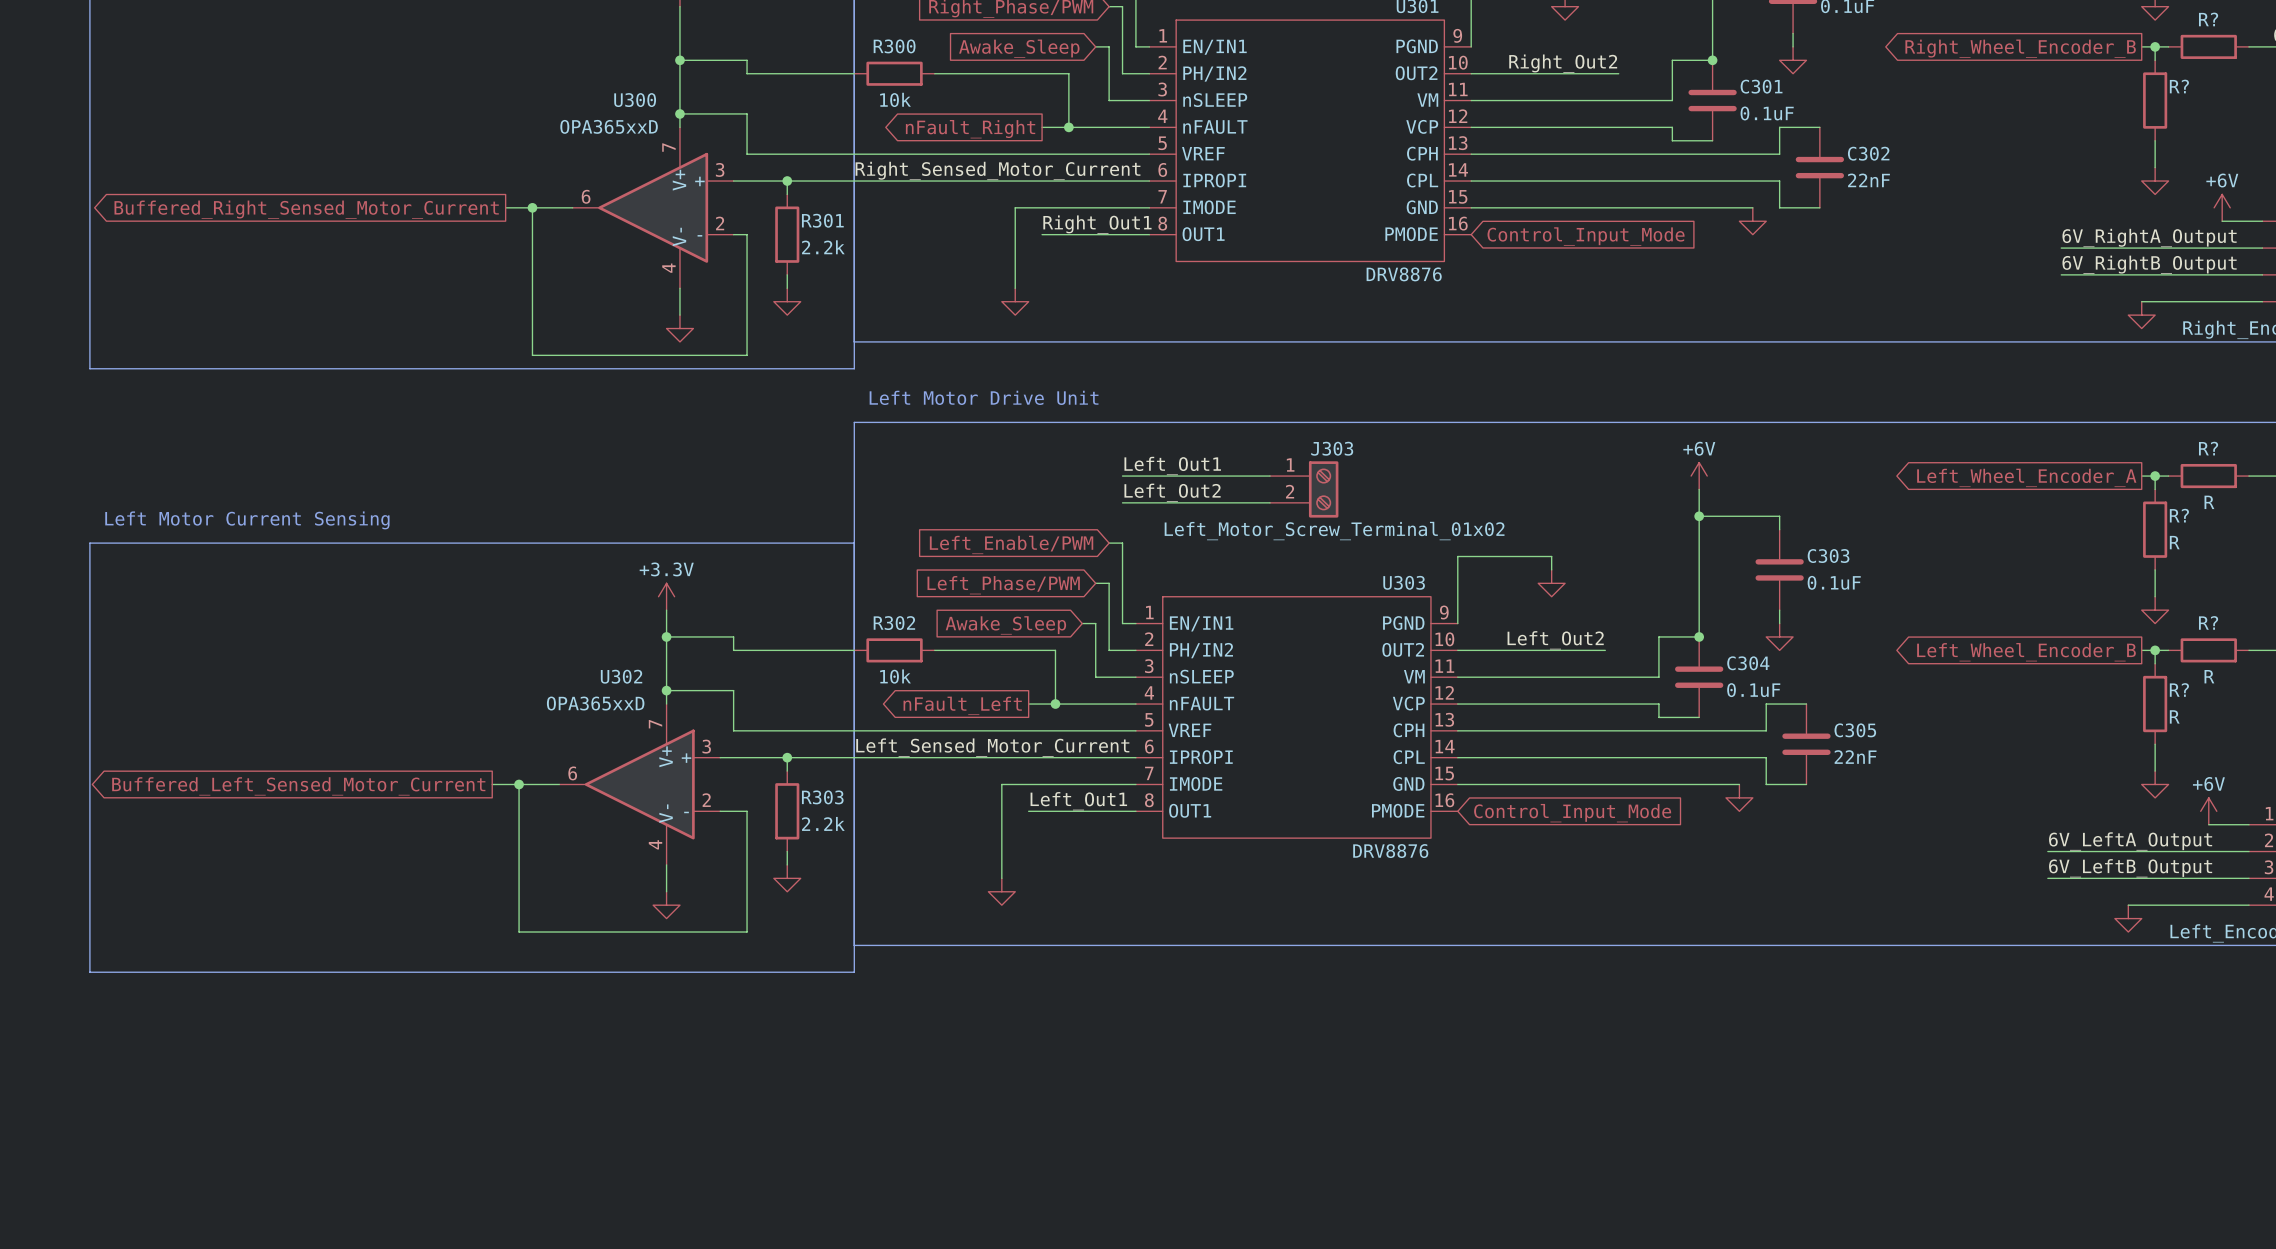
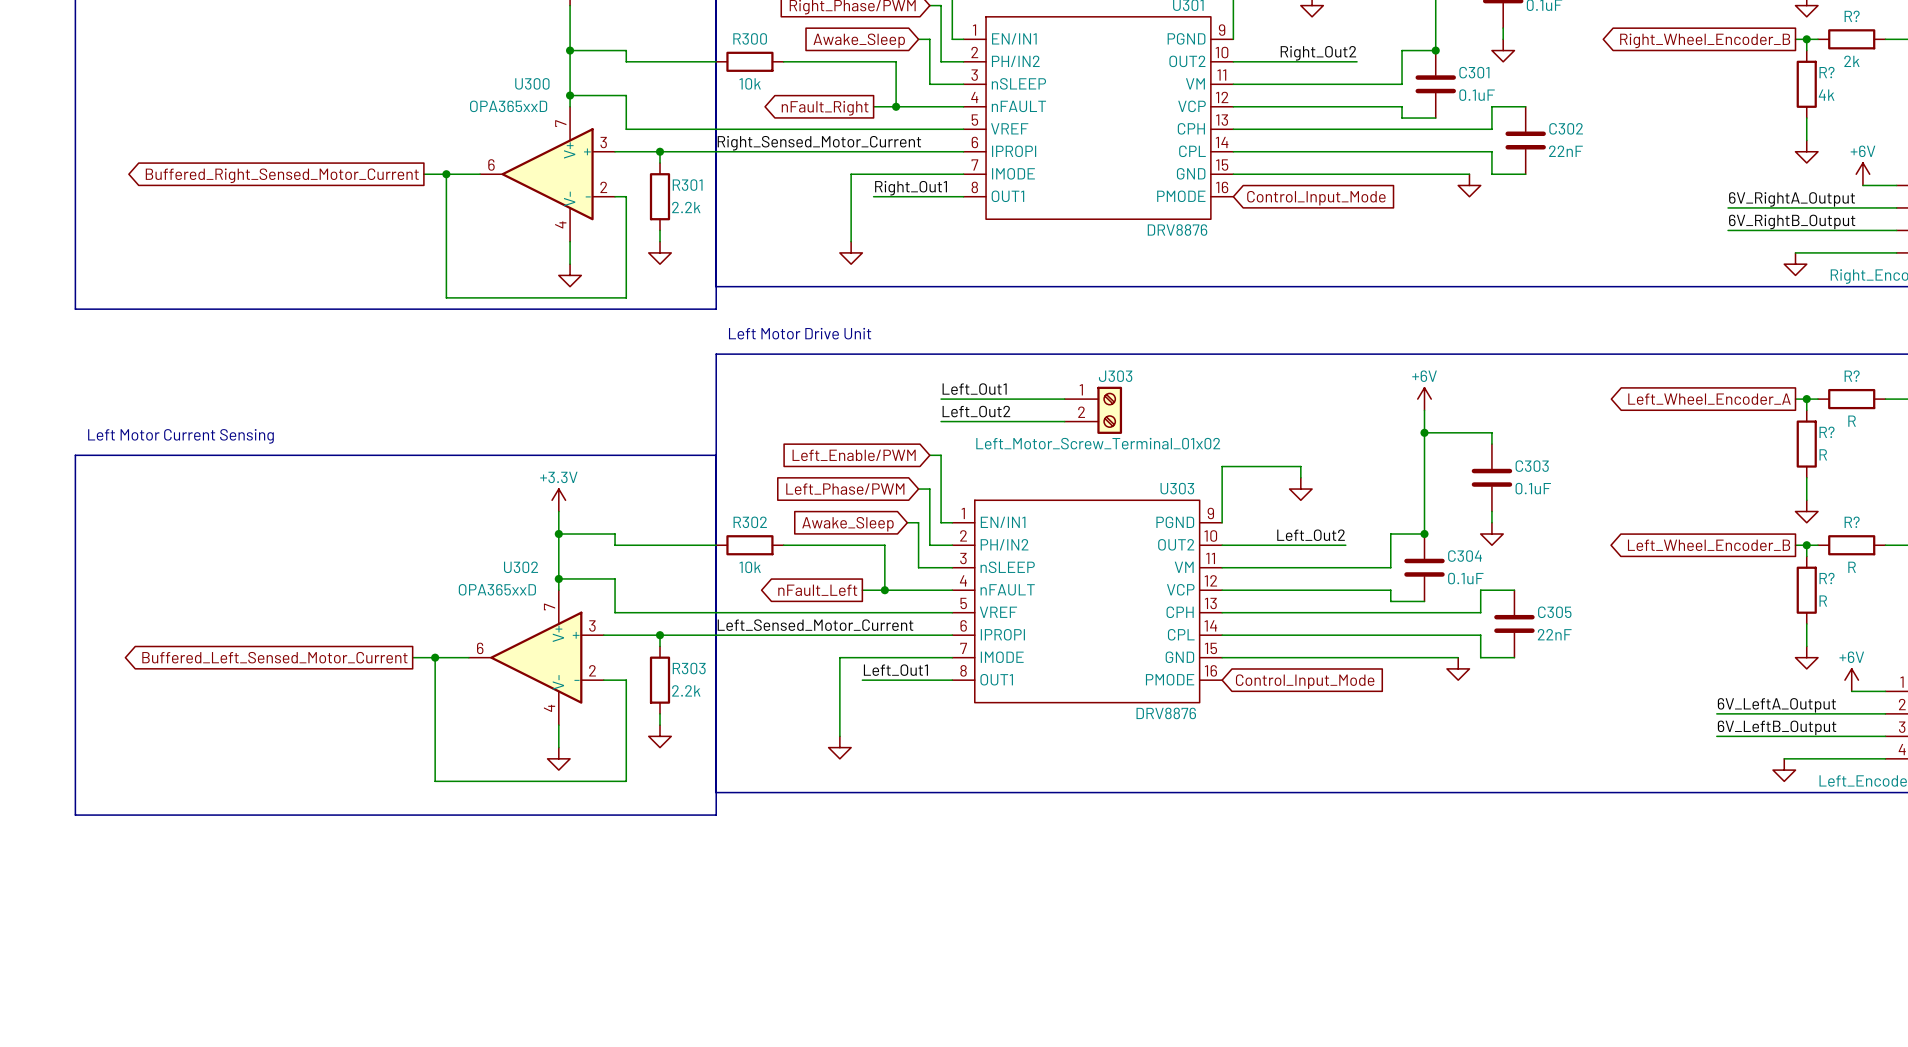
R? value: none -> 2k (1851, 61)
R? value: none -> 4k (1826, 95)

